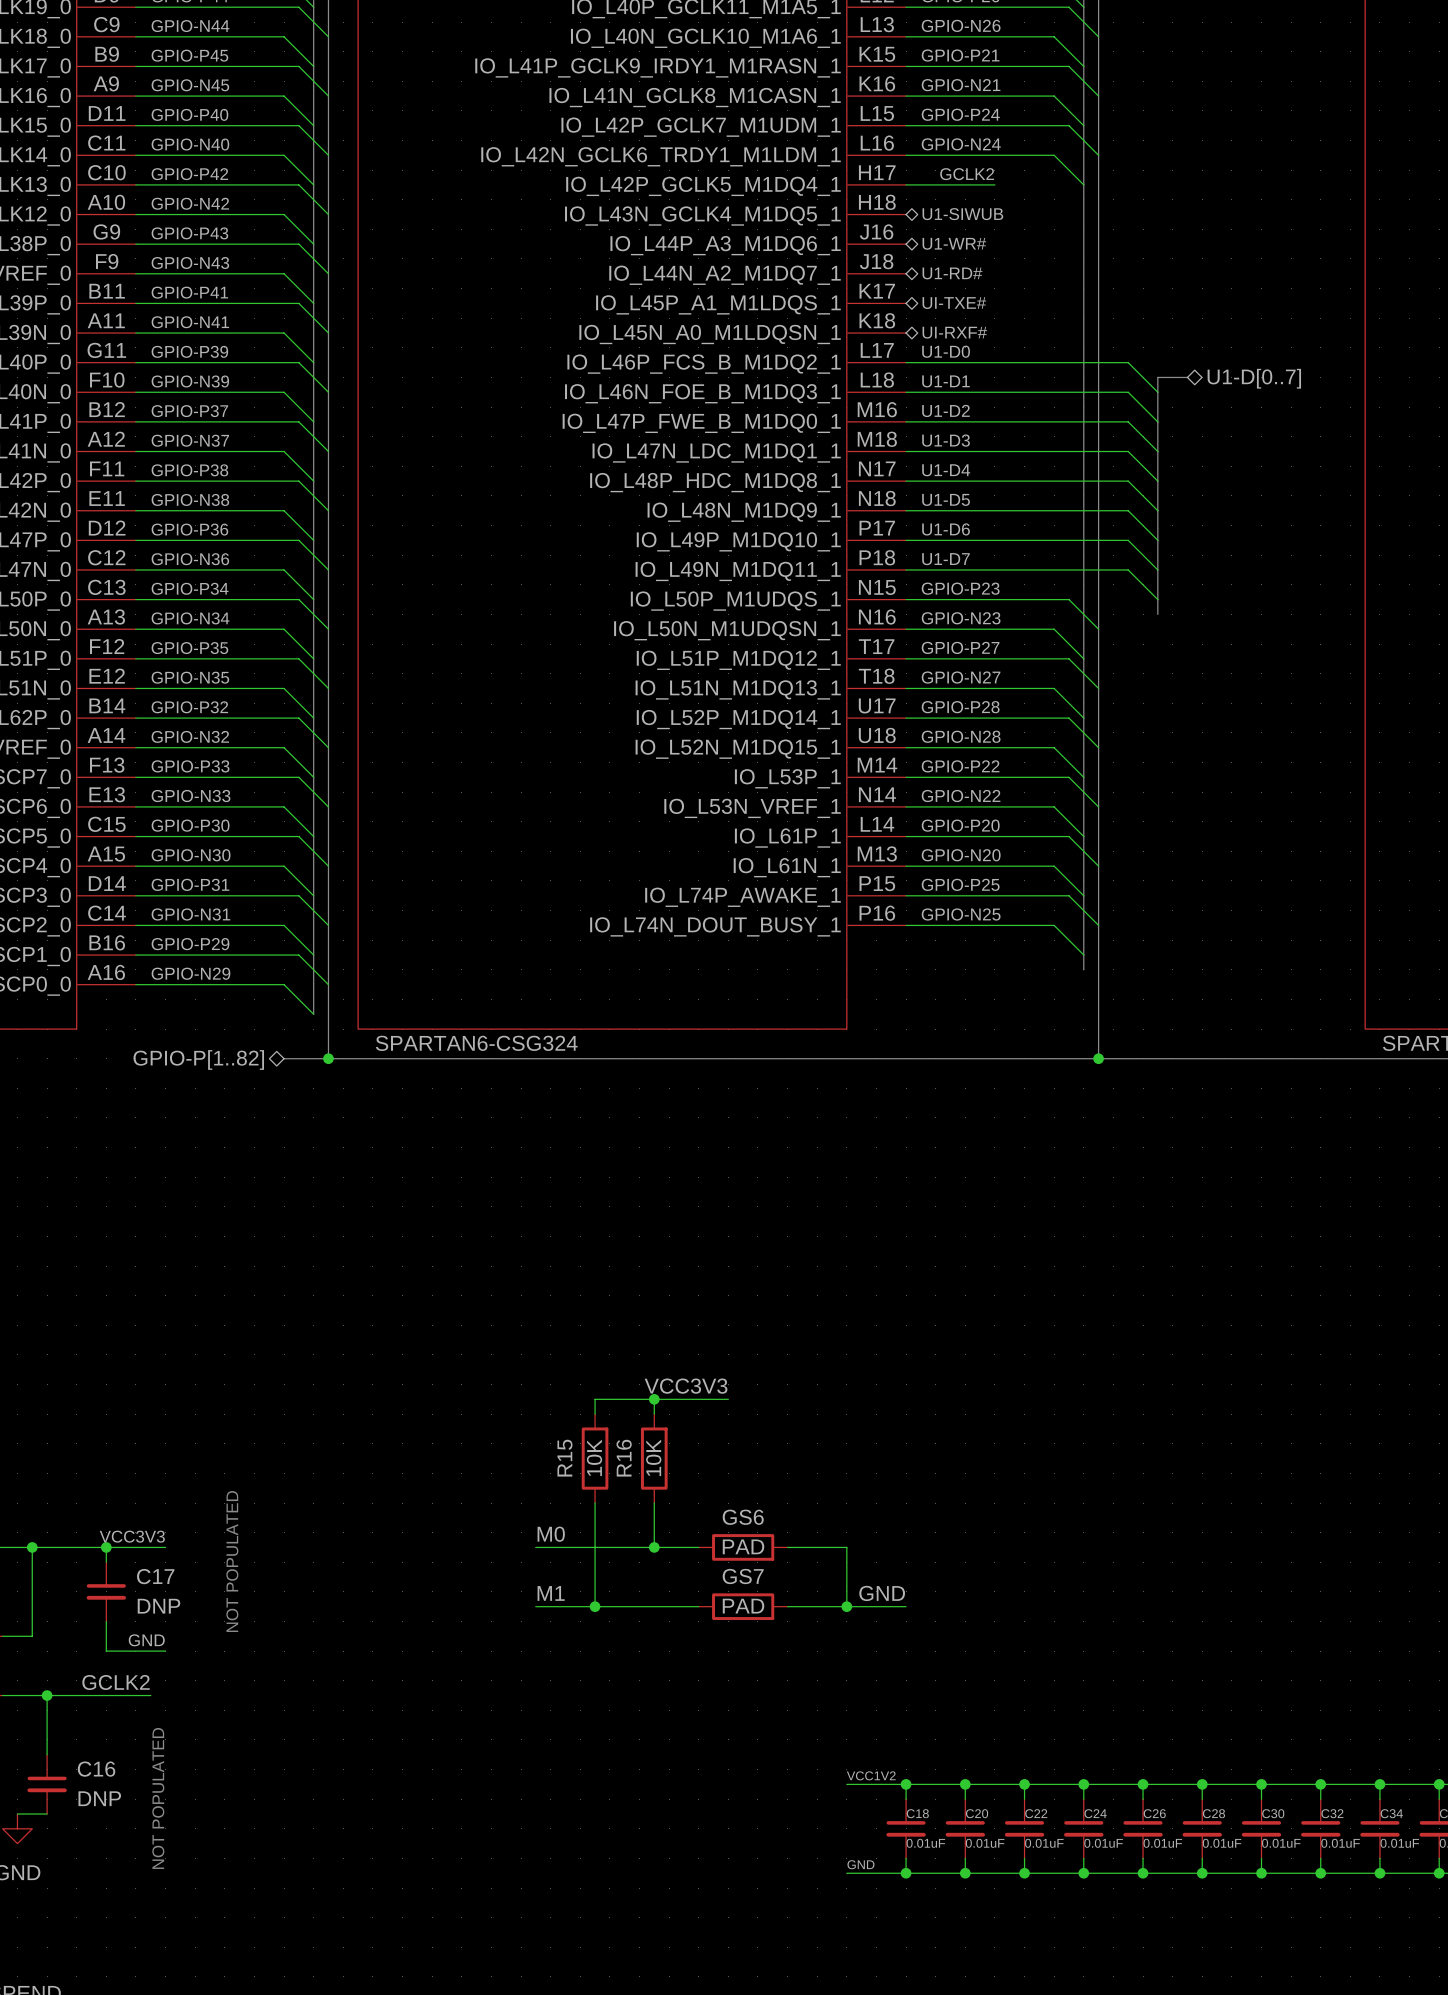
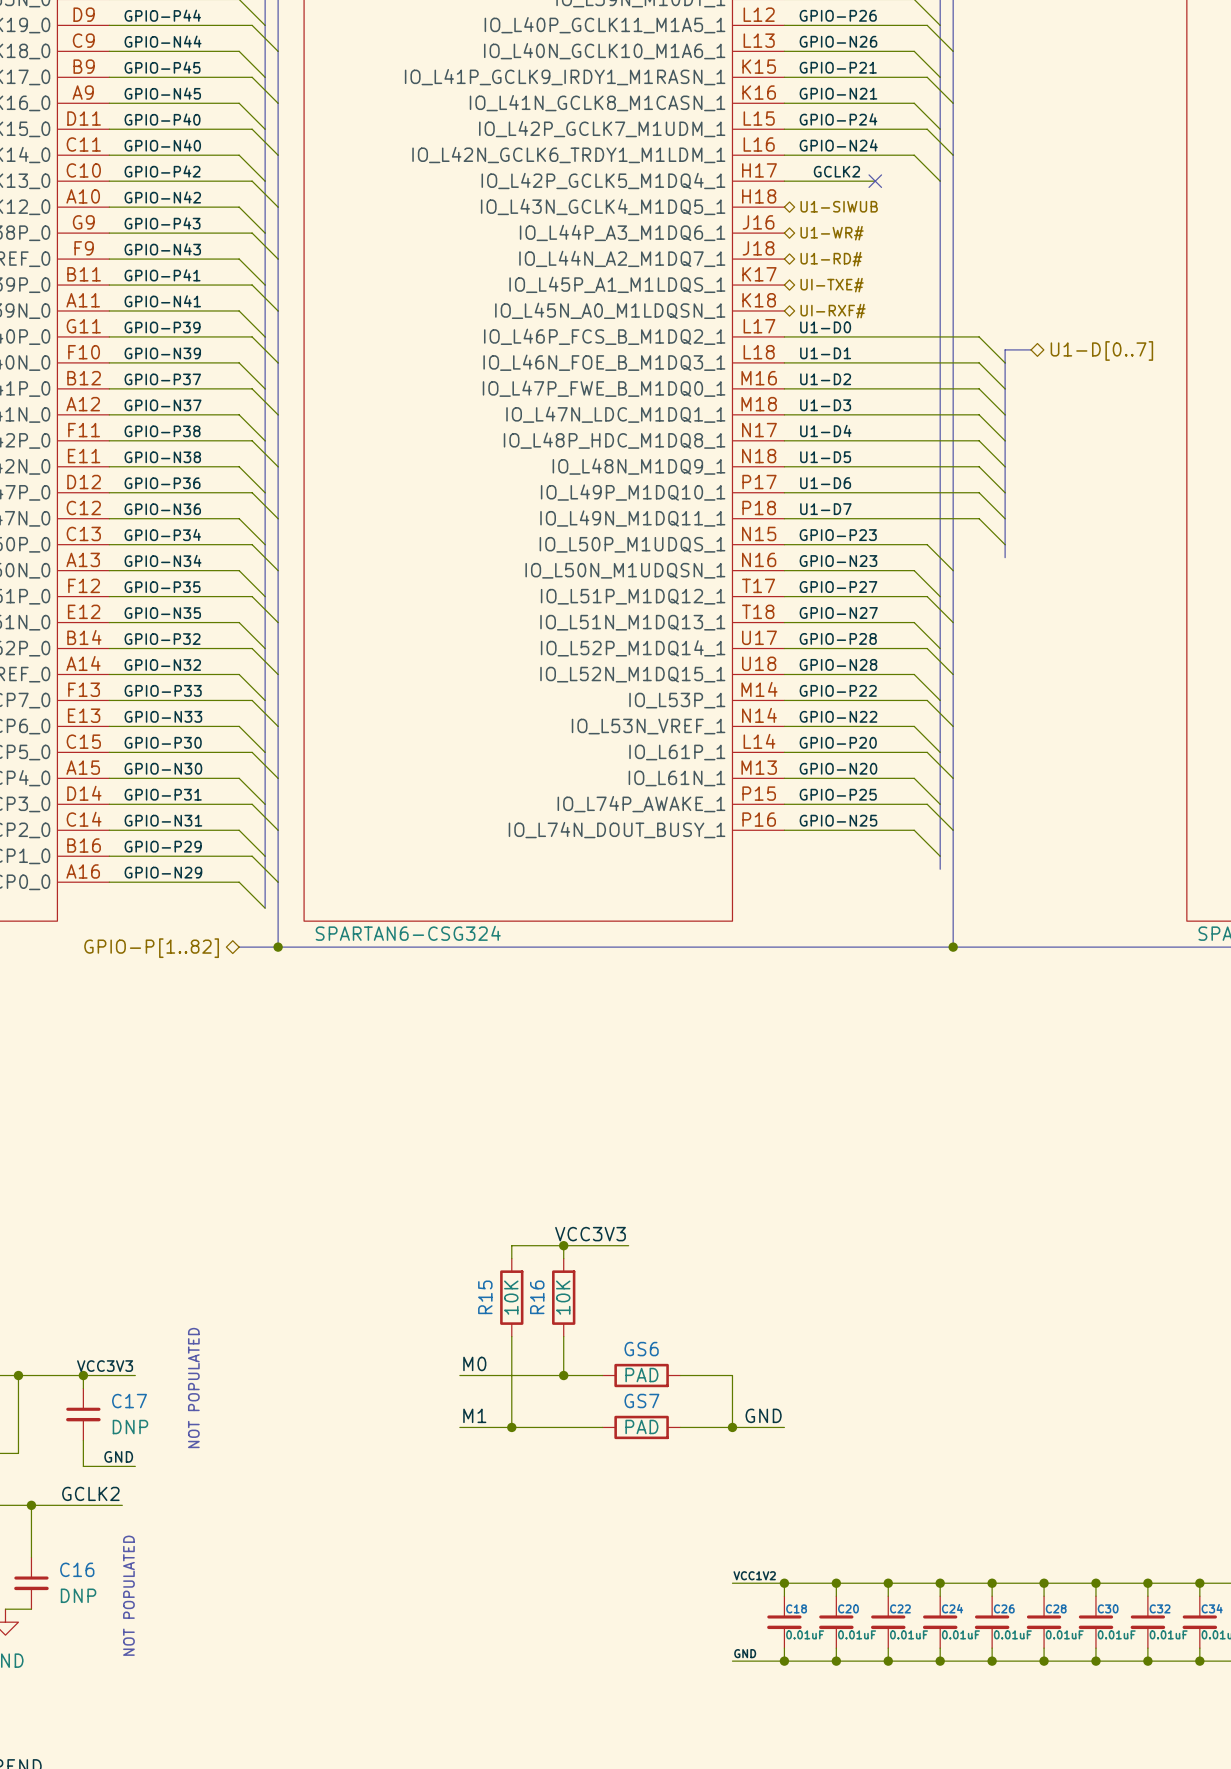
wire: none -> (862, 181) (875, 181)
no-connect mark: none -> (875, 181)

